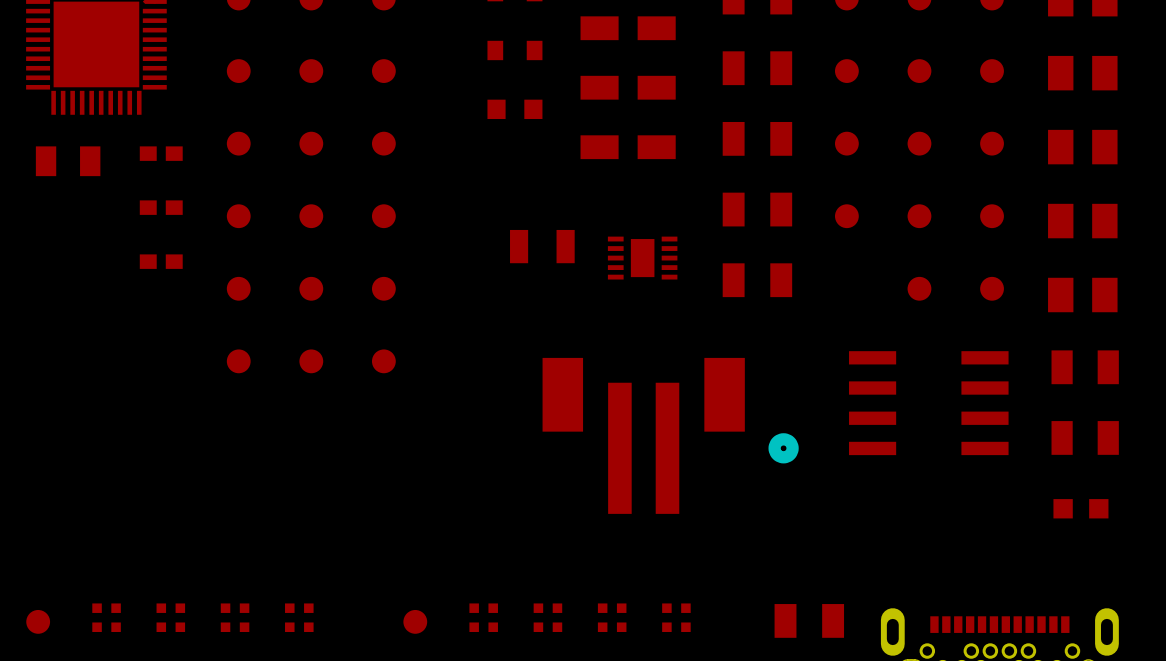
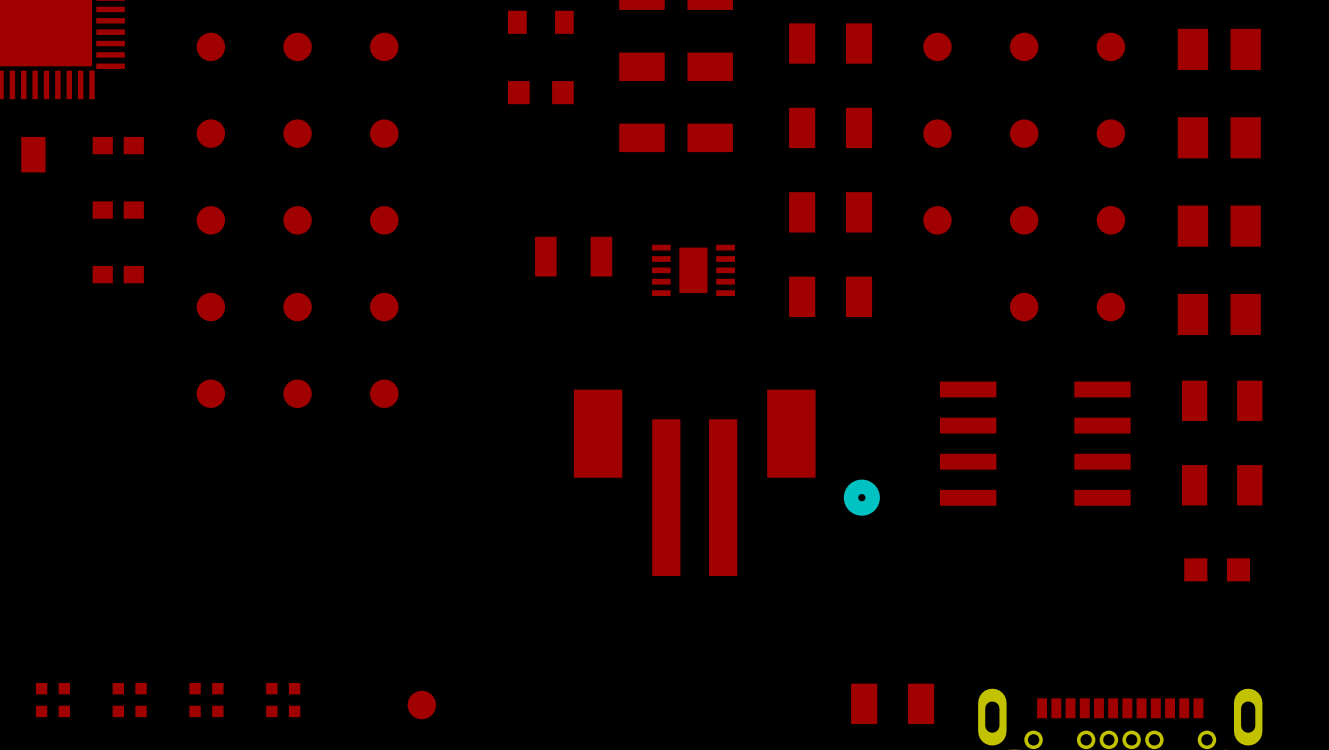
part: (483, 617) -> none
part: (547, 617) -> none
part: (612, 617) -> none
part: (676, 617) -> none

